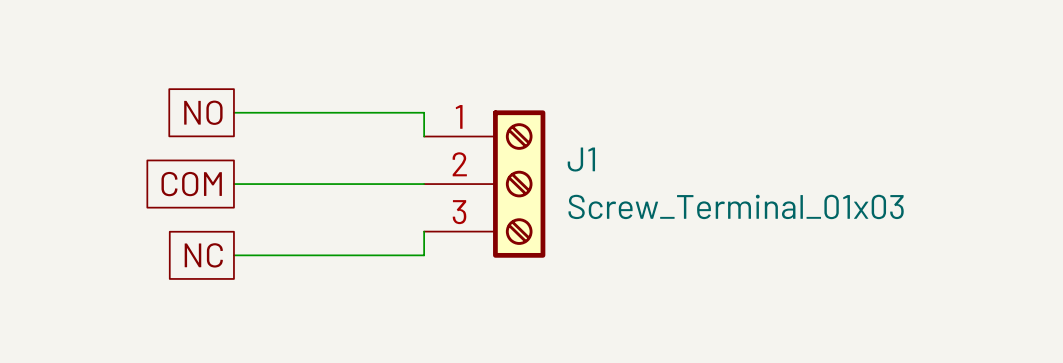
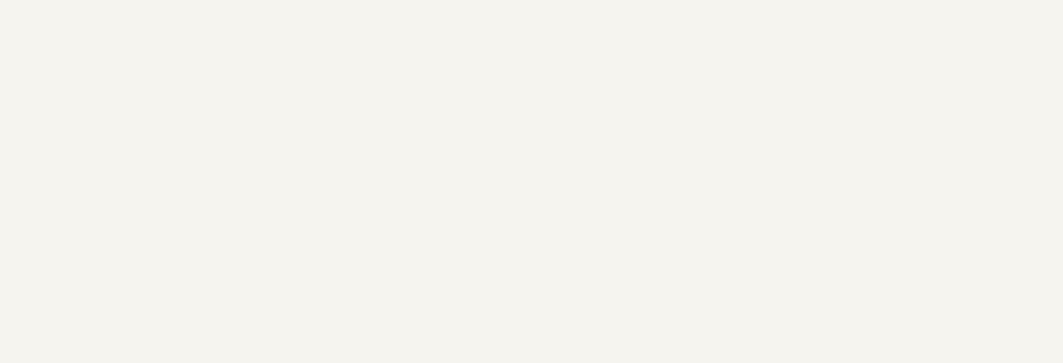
global label: NO (203, 112) -> none
wire: (233, 112) (424, 112) (424, 136) -> none
global label: COM (191, 184) -> none
wire: (233, 184) (424, 184) -> none
J1: Screw_Terminal_01x03 (484, 184) -> none
wire: (424, 231) (424, 255) (233, 255) -> none
global label: NC (203, 255) -> none

